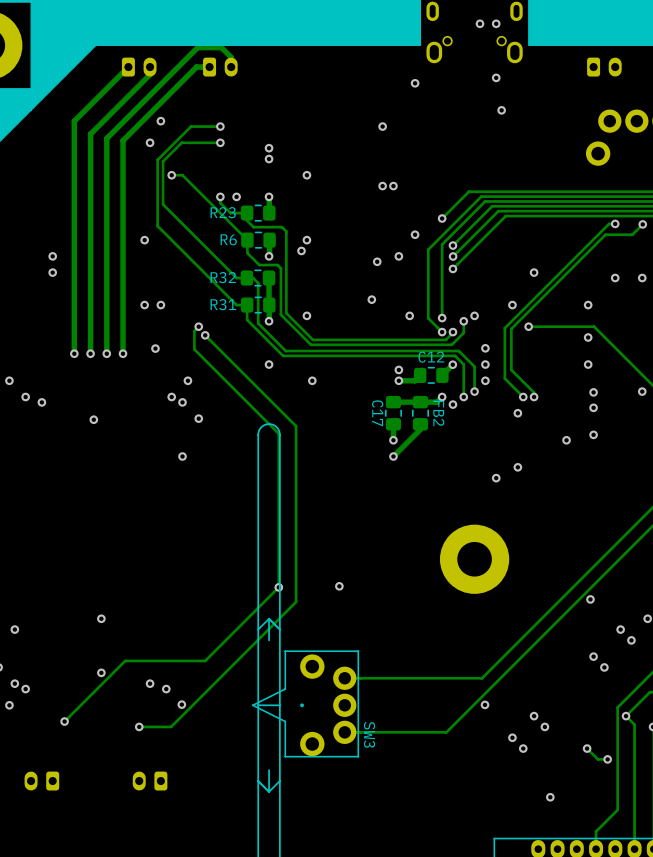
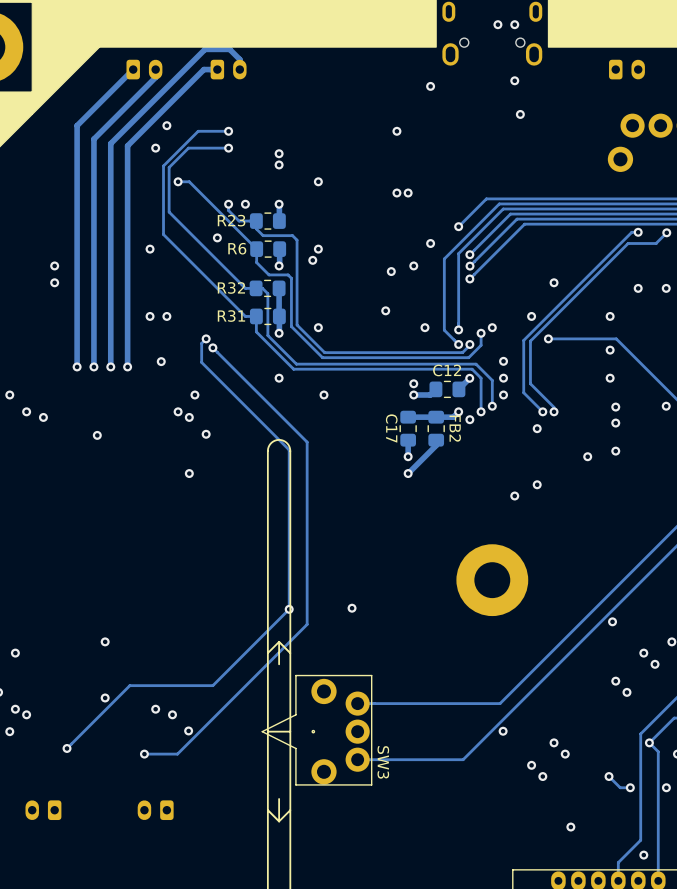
via: none -> (217, 237)
via: none -> (666, 787)
via: none -> (643, 855)

